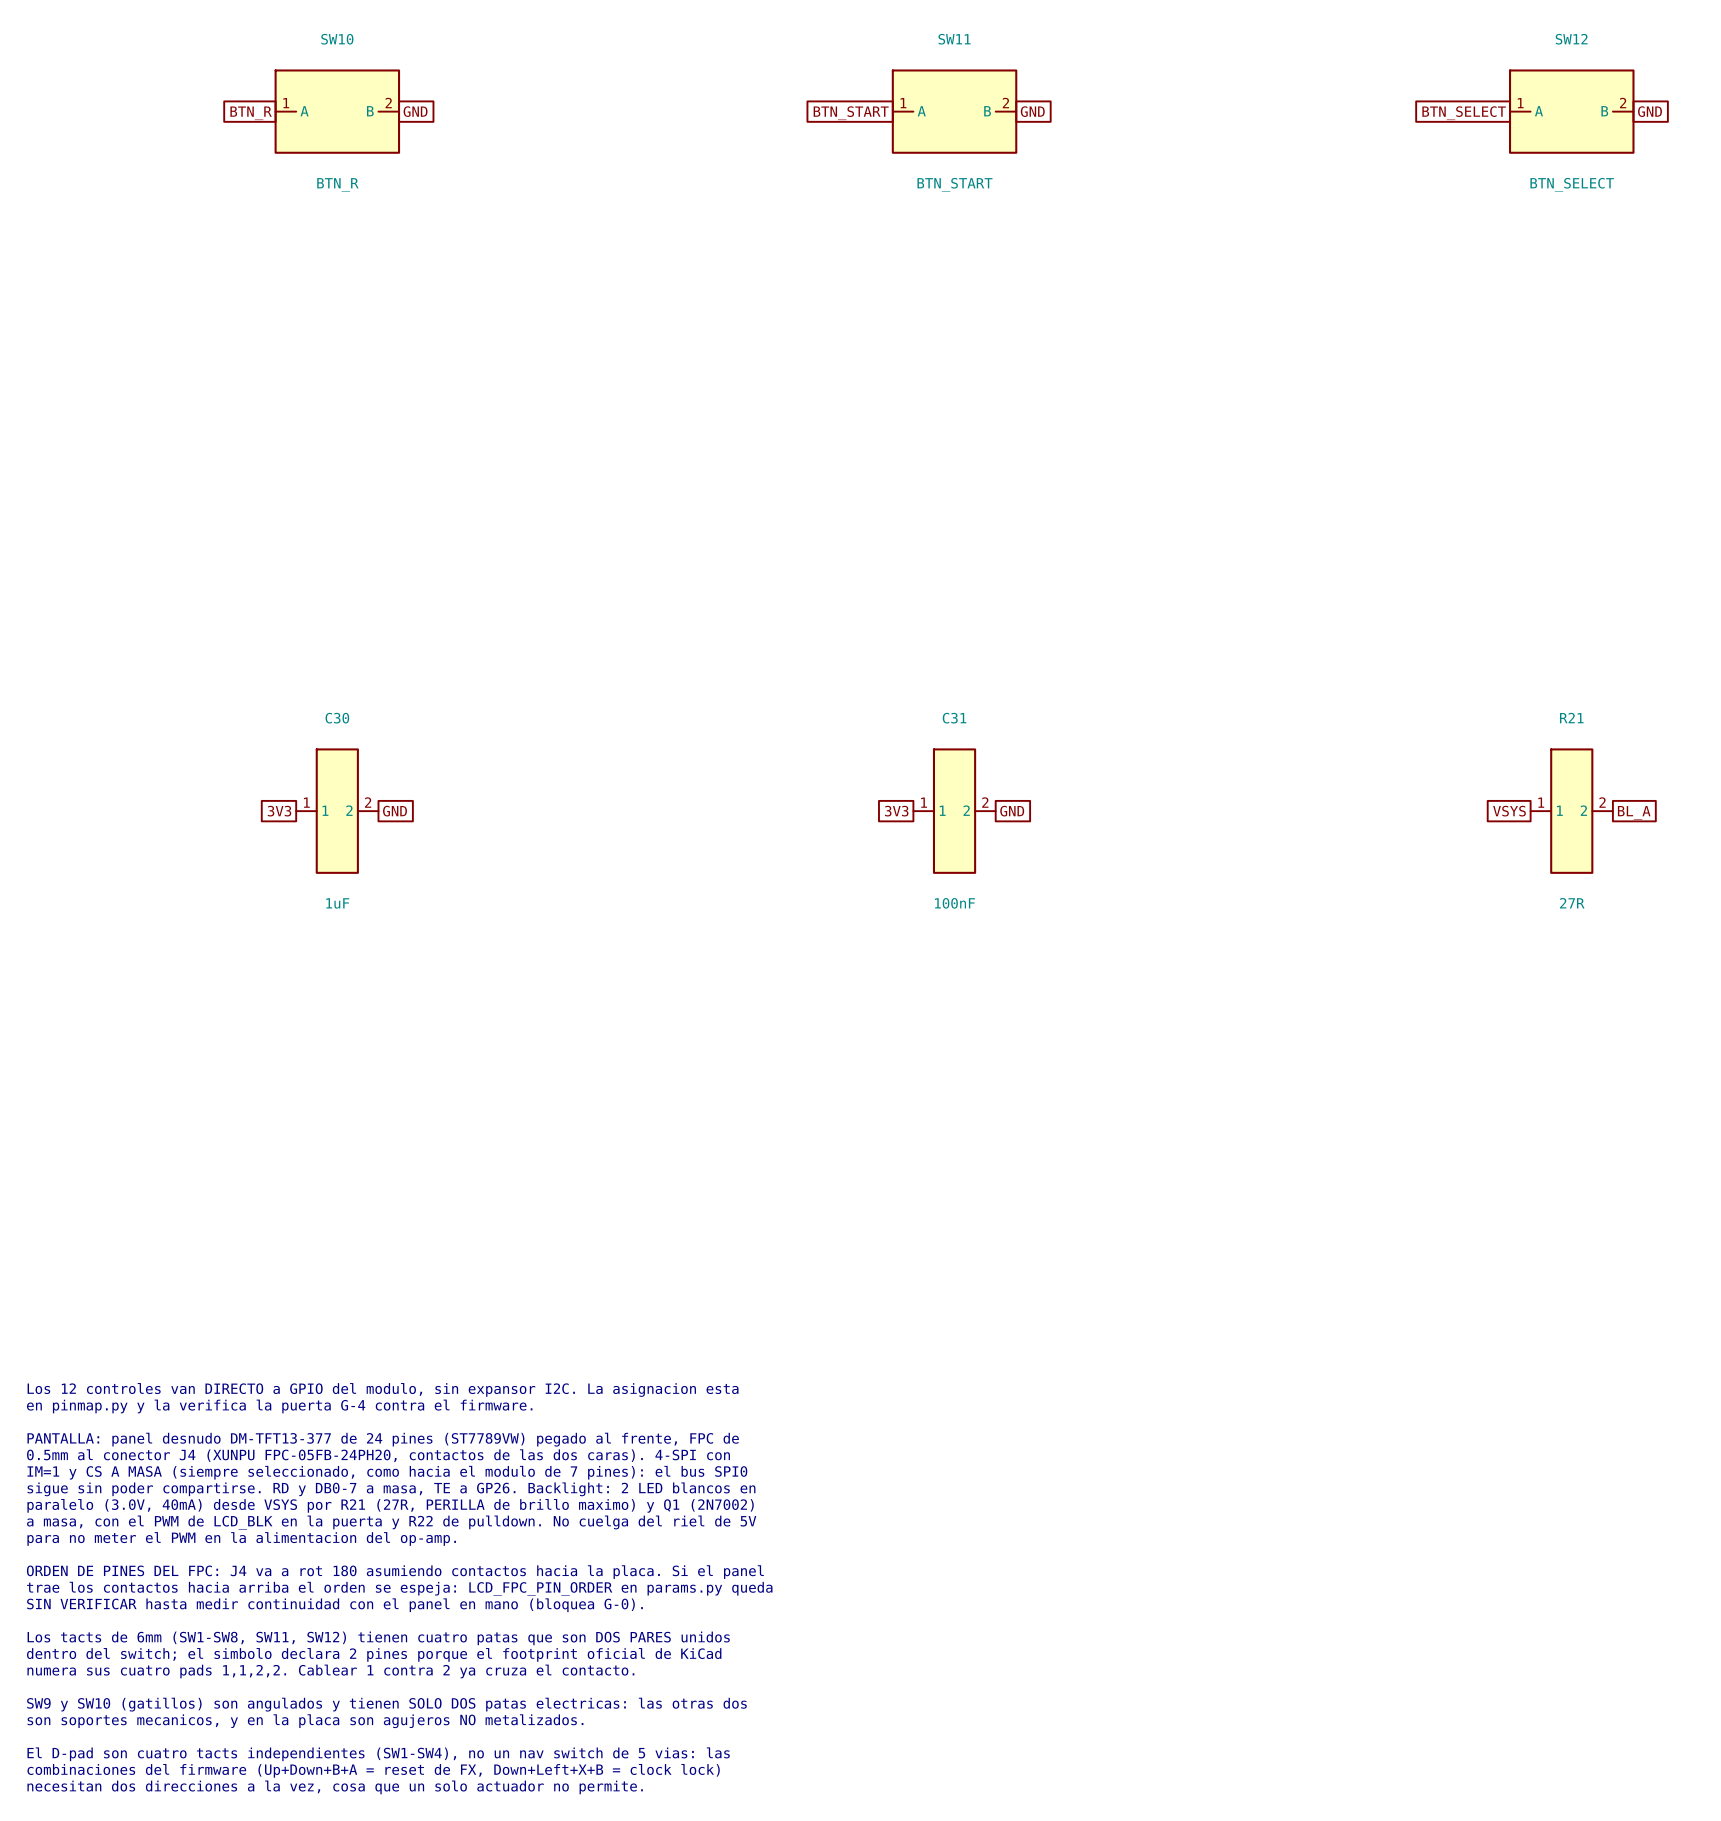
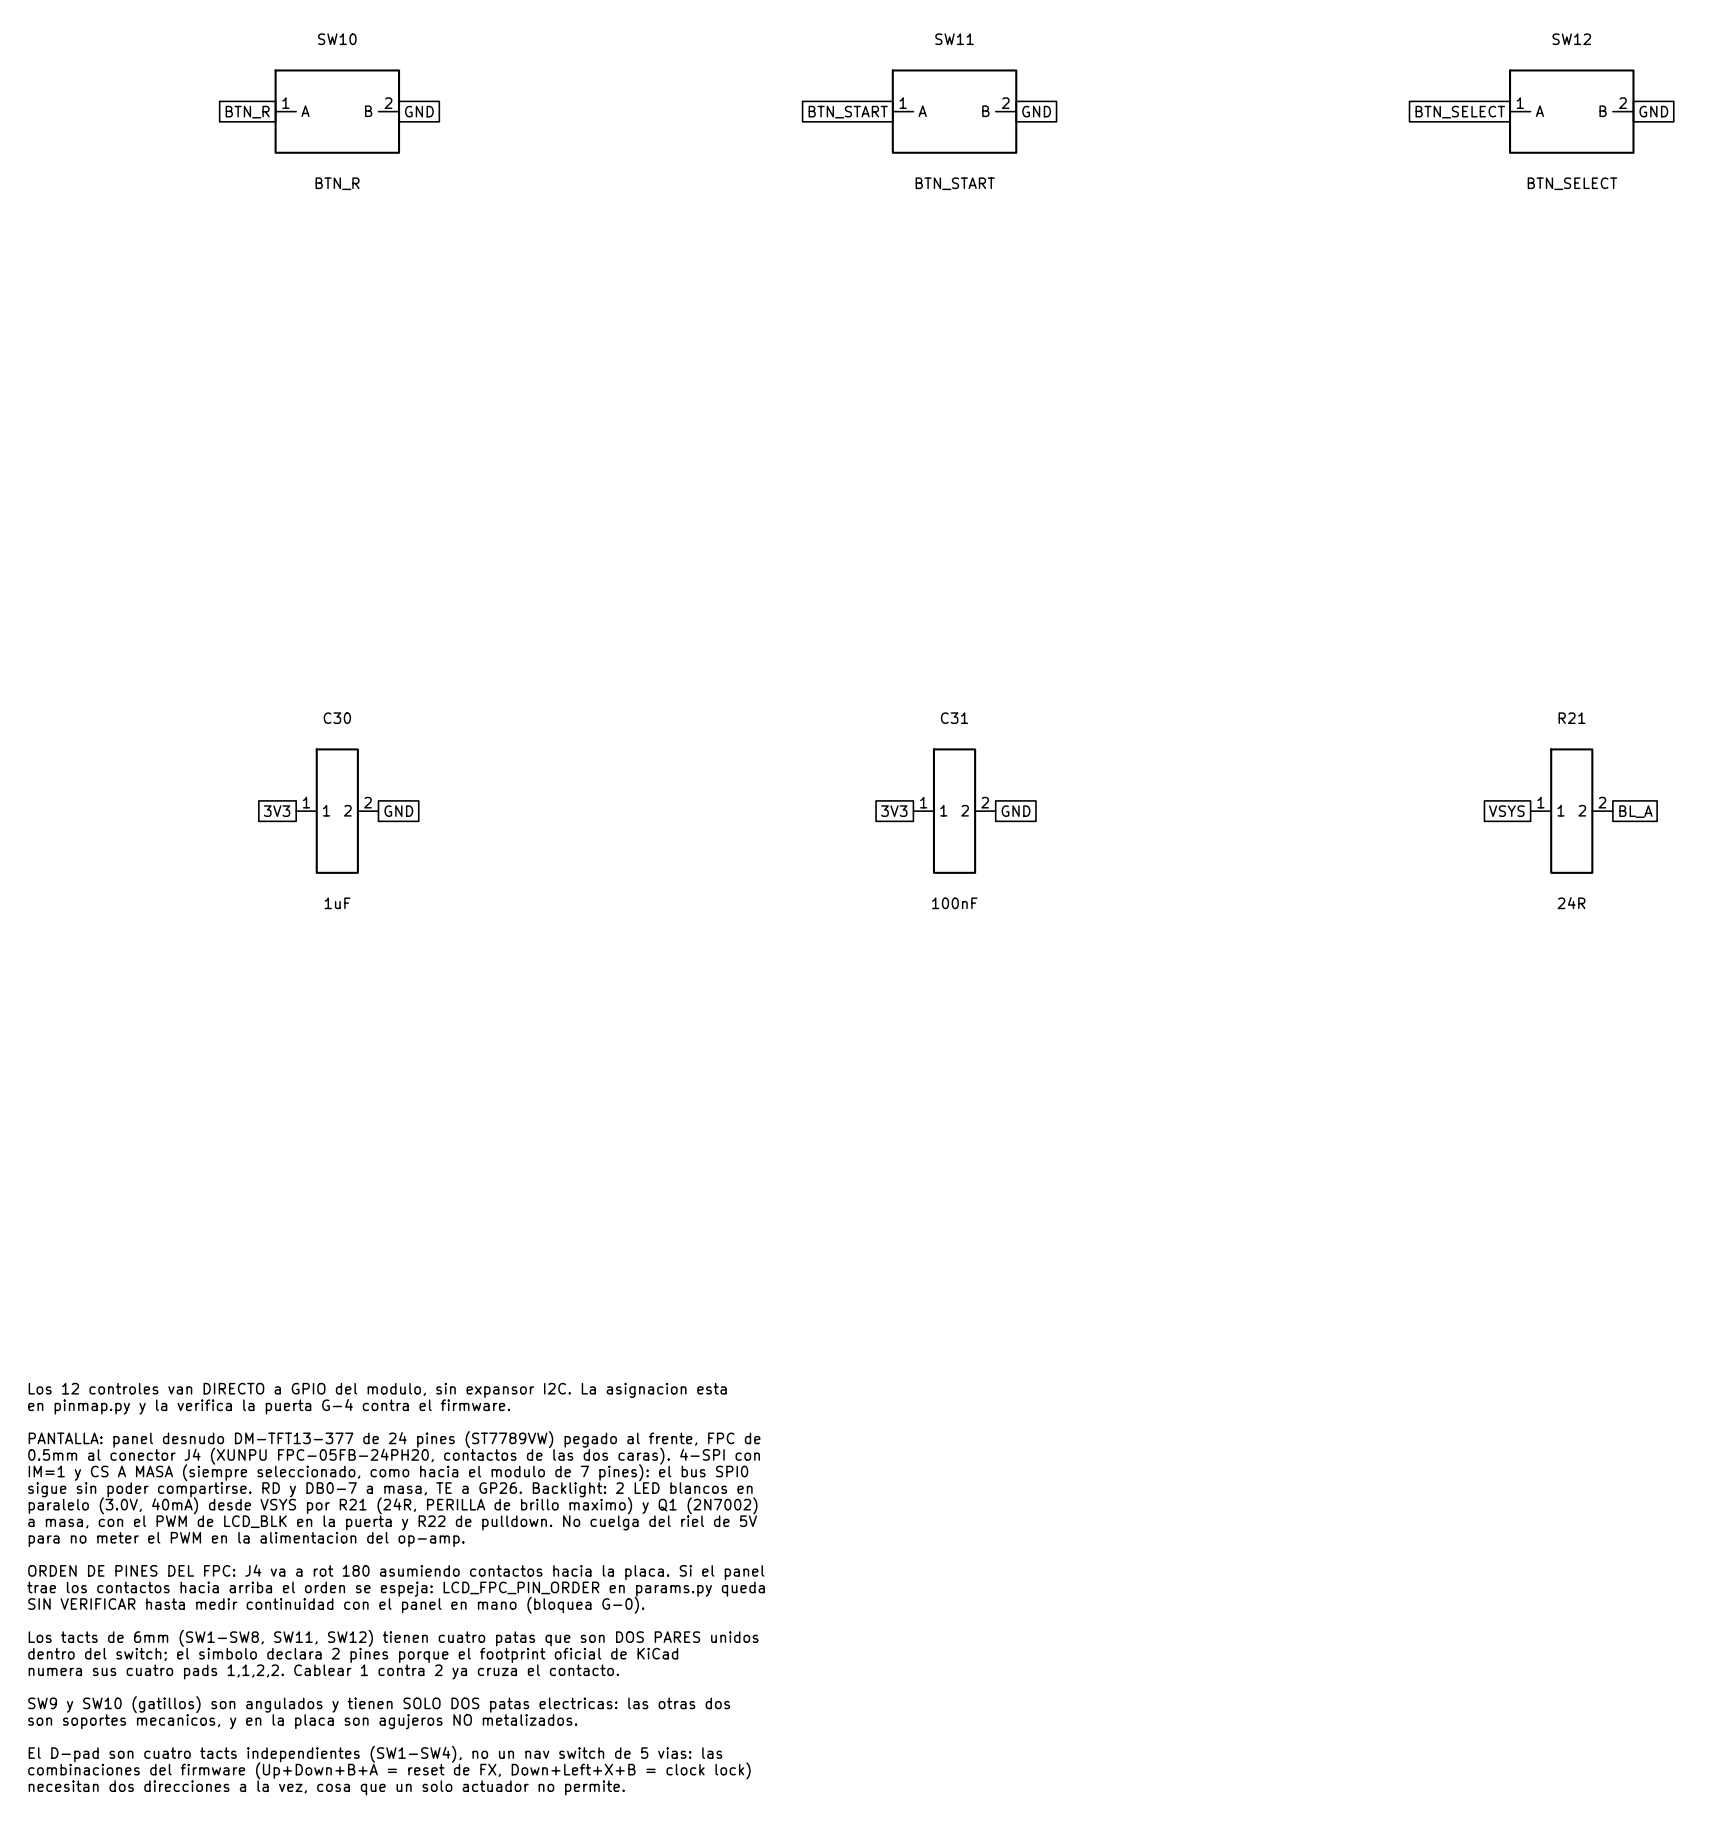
R21 value: 27R (1572, 903) -> 24R (1571, 903)
text: paralelo (3.0V, 40mA) desde VSYS por R21 (27R, PERILLA de brillo maximo) y Q1 (2N7002) (390, 1505) -> paralelo (3.0V, 40mA) desde VSYS por R21 (24R, PERILLA de brillo maximo) y Q1 (2N7002) (393, 1505)

